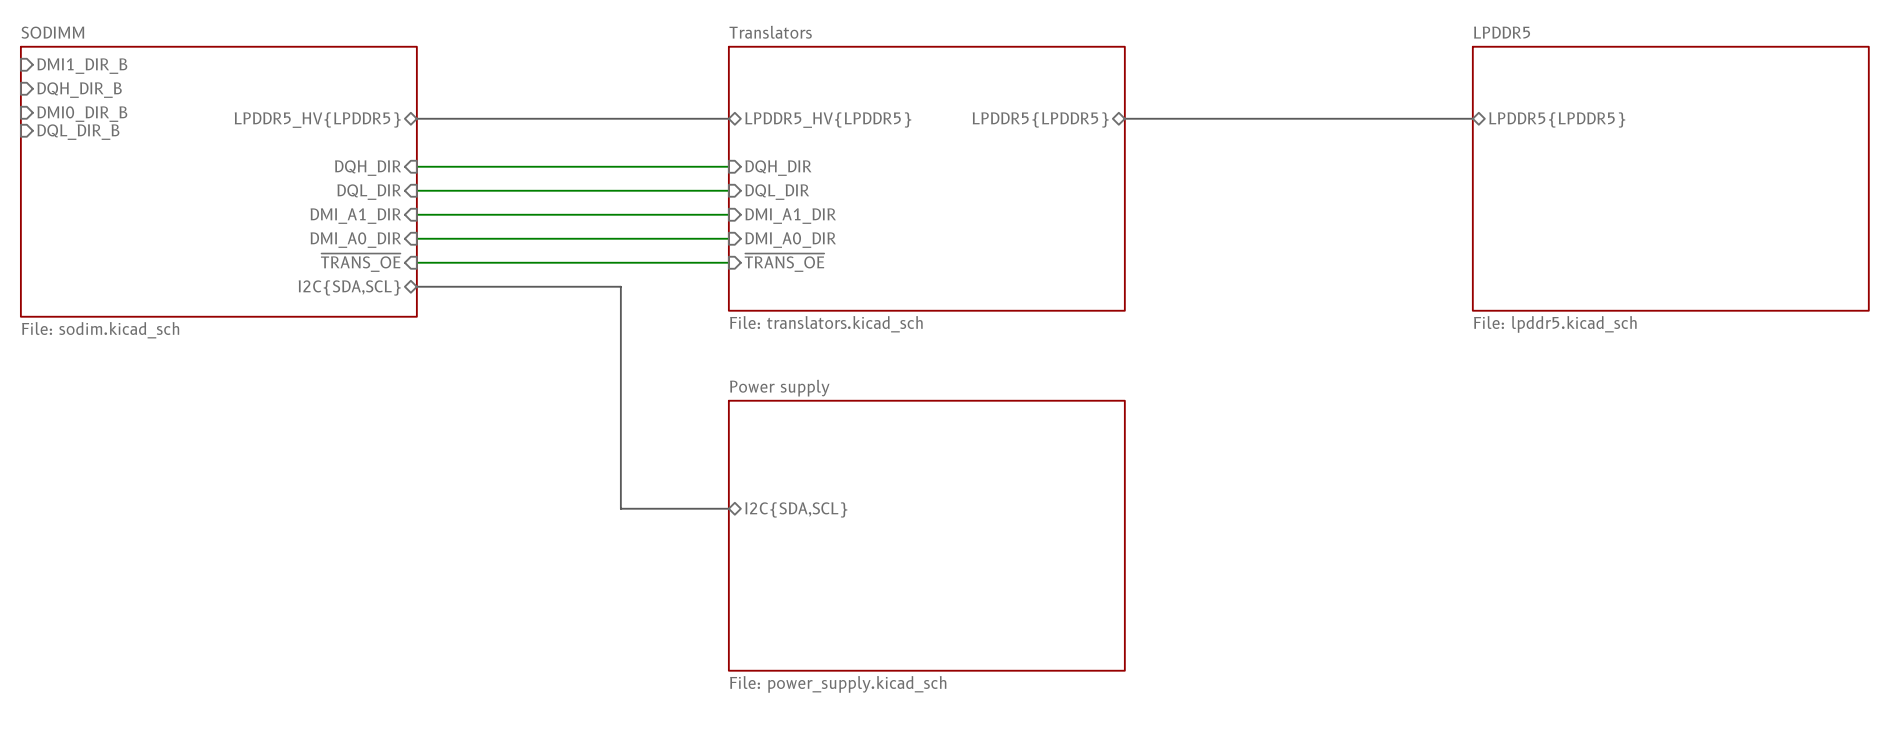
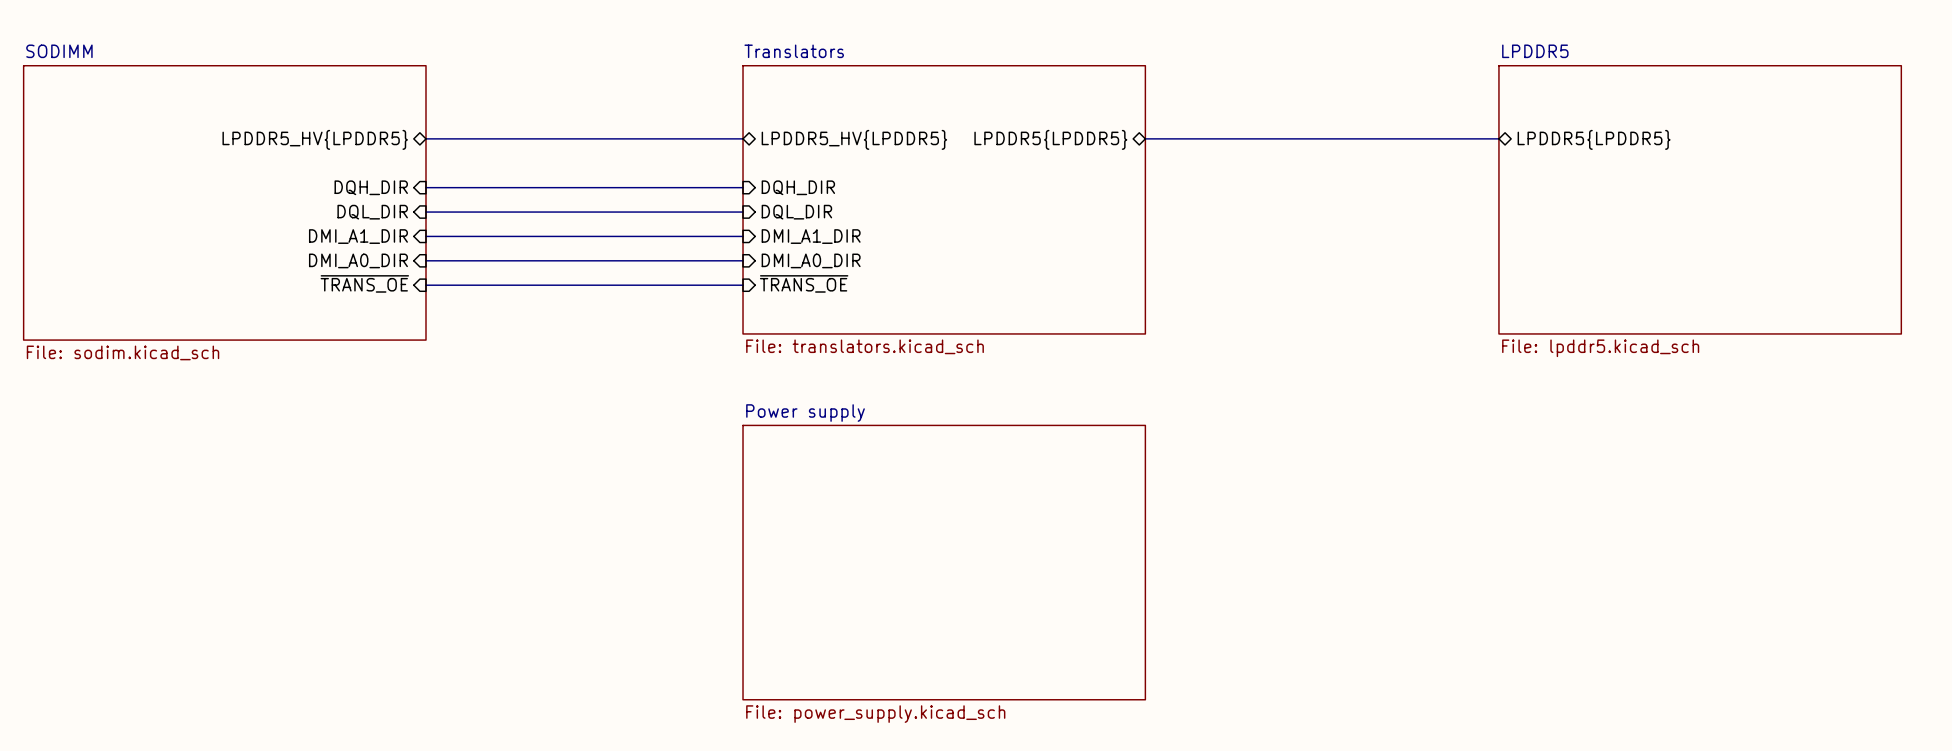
sheet pin: DMI1_DIR_B (82, 66) -> none
sheet pin: DQH_DIR_B (79, 90) -> none
sheet pin: DMI0_DIR_B (82, 114) -> none
sheet pin: DQL_DIR_B (78, 132) -> none
bus: (416, 286) (620, 286) (620, 508) (728, 508) -> none
sheet pin: I2C{SDA,SCL} (349, 287) -> none
sheet pin: I2C{SDA,SCL} (796, 509) -> none

